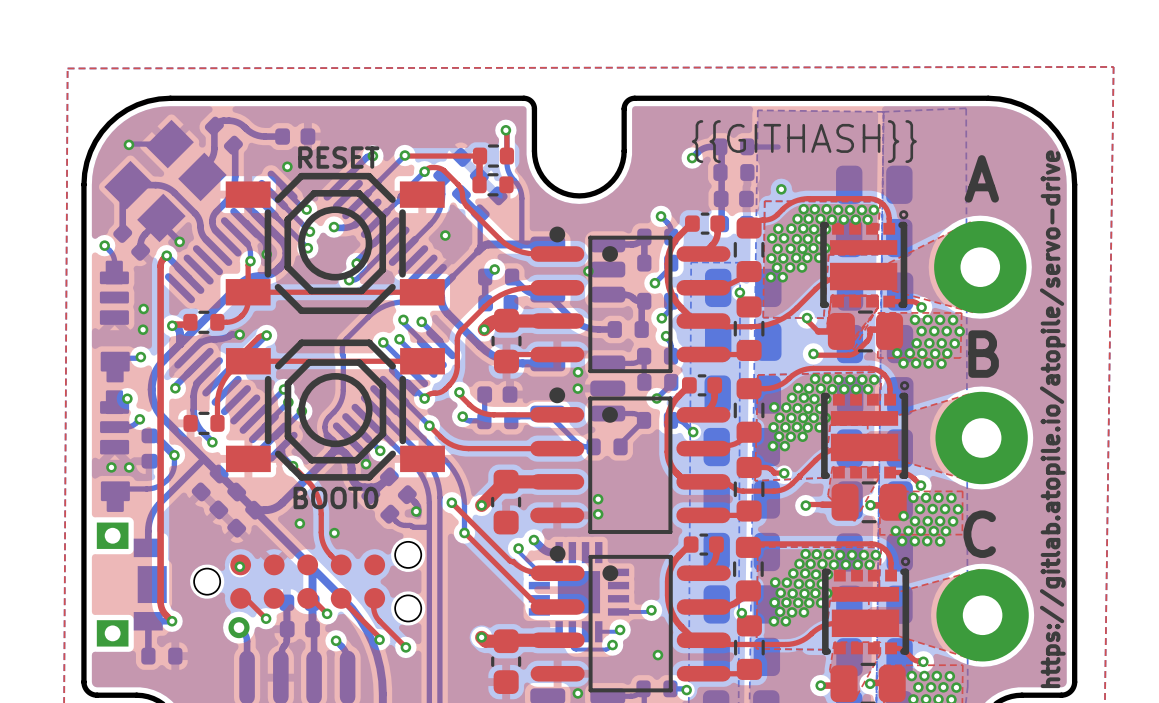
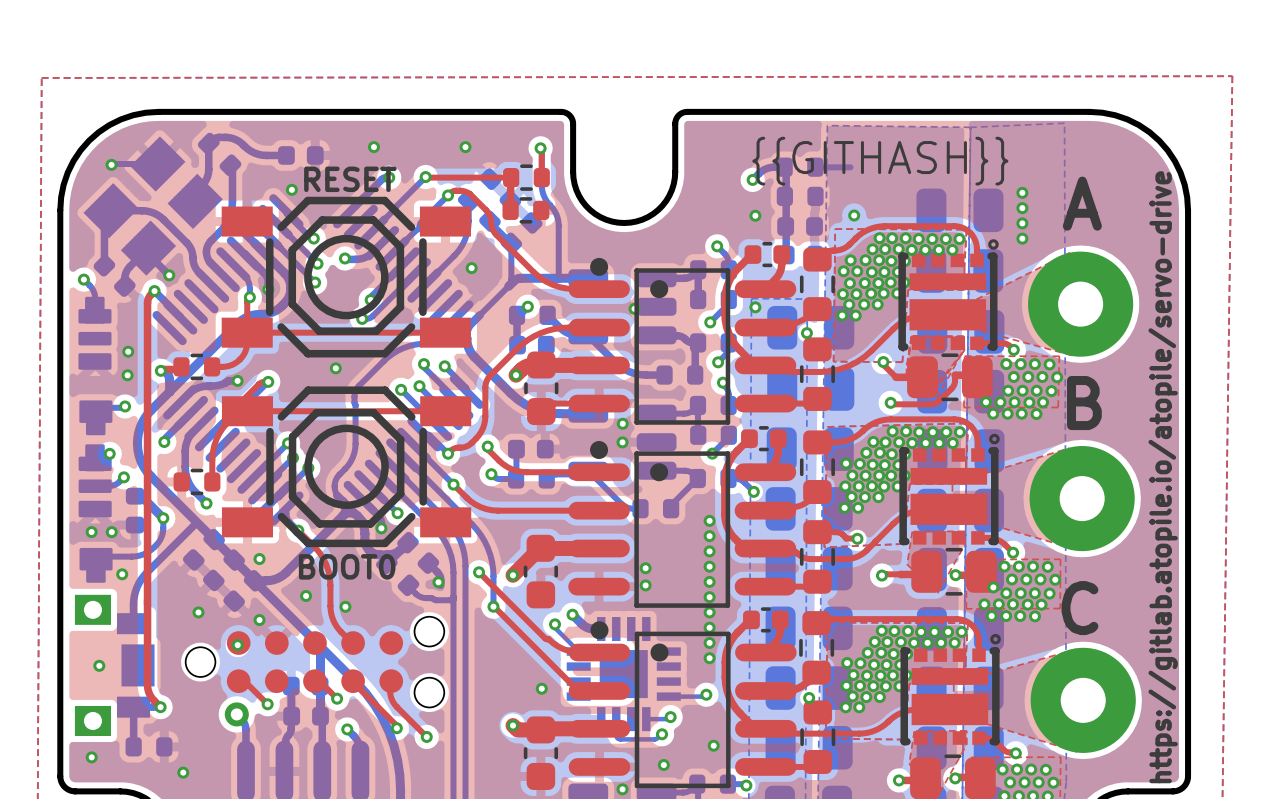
via: none -> (373, 147)
via: none -> (465, 147)
via: none -> (1022, 192)
via: none -> (1022, 208)
via: none -> (755, 215)
via: none -> (1022, 223)
via: none -> (1022, 238)
via: none -> (755, 307)
via: none -> (335, 368)
via: none -> (709, 520)
via: none -> (709, 536)
via: none -> (709, 551)
via: none -> (259, 559)
via: none -> (709, 566)
via: none -> (122, 574)
via: none -> (709, 581)
via: none -> (709, 597)
via: none -> (198, 612)
via: none -> (709, 612)
via: none -> (259, 620)
via: none -> (709, 627)
via: none -> (709, 642)
via: none -> (709, 658)
via: none -> (99, 665)
via: none -> (541, 688)
via: none -> (91, 757)
via: none -> (663, 765)
via: none -> (183, 772)

